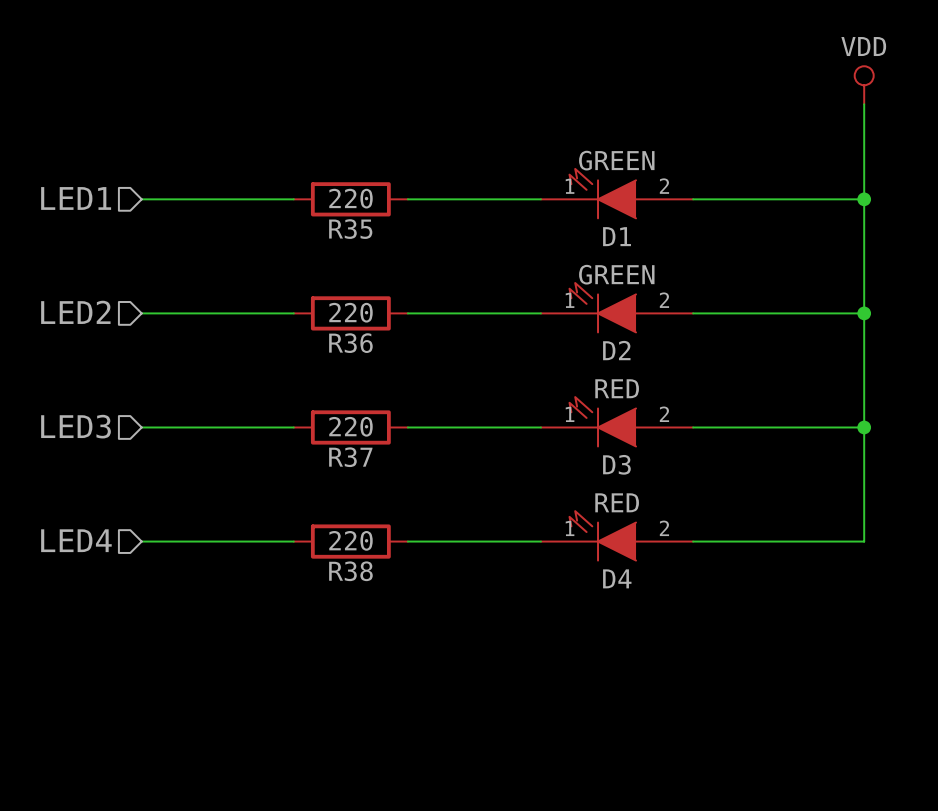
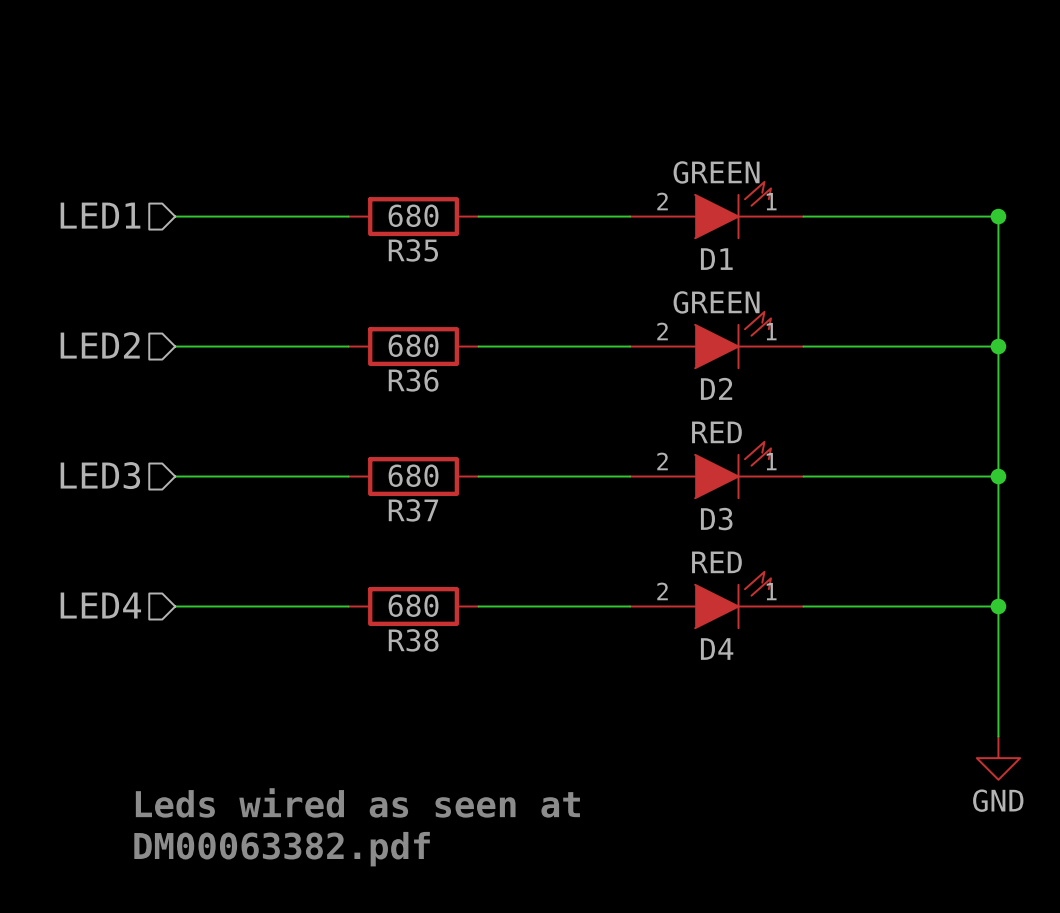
power symbol: VDD (864, 85) -> none
wire: (864, 104) (864, 199) -> none
D1 flip: as is (602, 193) -> left-right (733, 210)
R35 value: 220 (350, 198) -> 680 (413, 215)
D2 flip: as is (602, 307) -> left-right (733, 340)
R36 value: 220 (350, 312) -> 680 (413, 345)
D3 flip: as is (602, 421) -> left-right (733, 470)
R37 value: 220 (350, 426) -> 680 (413, 475)
D4 flip: as is (602, 535) -> left-right (733, 600)
R38 value: 220 (350, 540) -> 680 (413, 605)
wire: none -> (998, 606) (998, 736)
junction: none -> (998, 606)
power symbol: none -> GND (998, 758)
text: none -> Leds wired as seen at (357, 802)
text: none -> DM00063382.pdf (282, 849)

